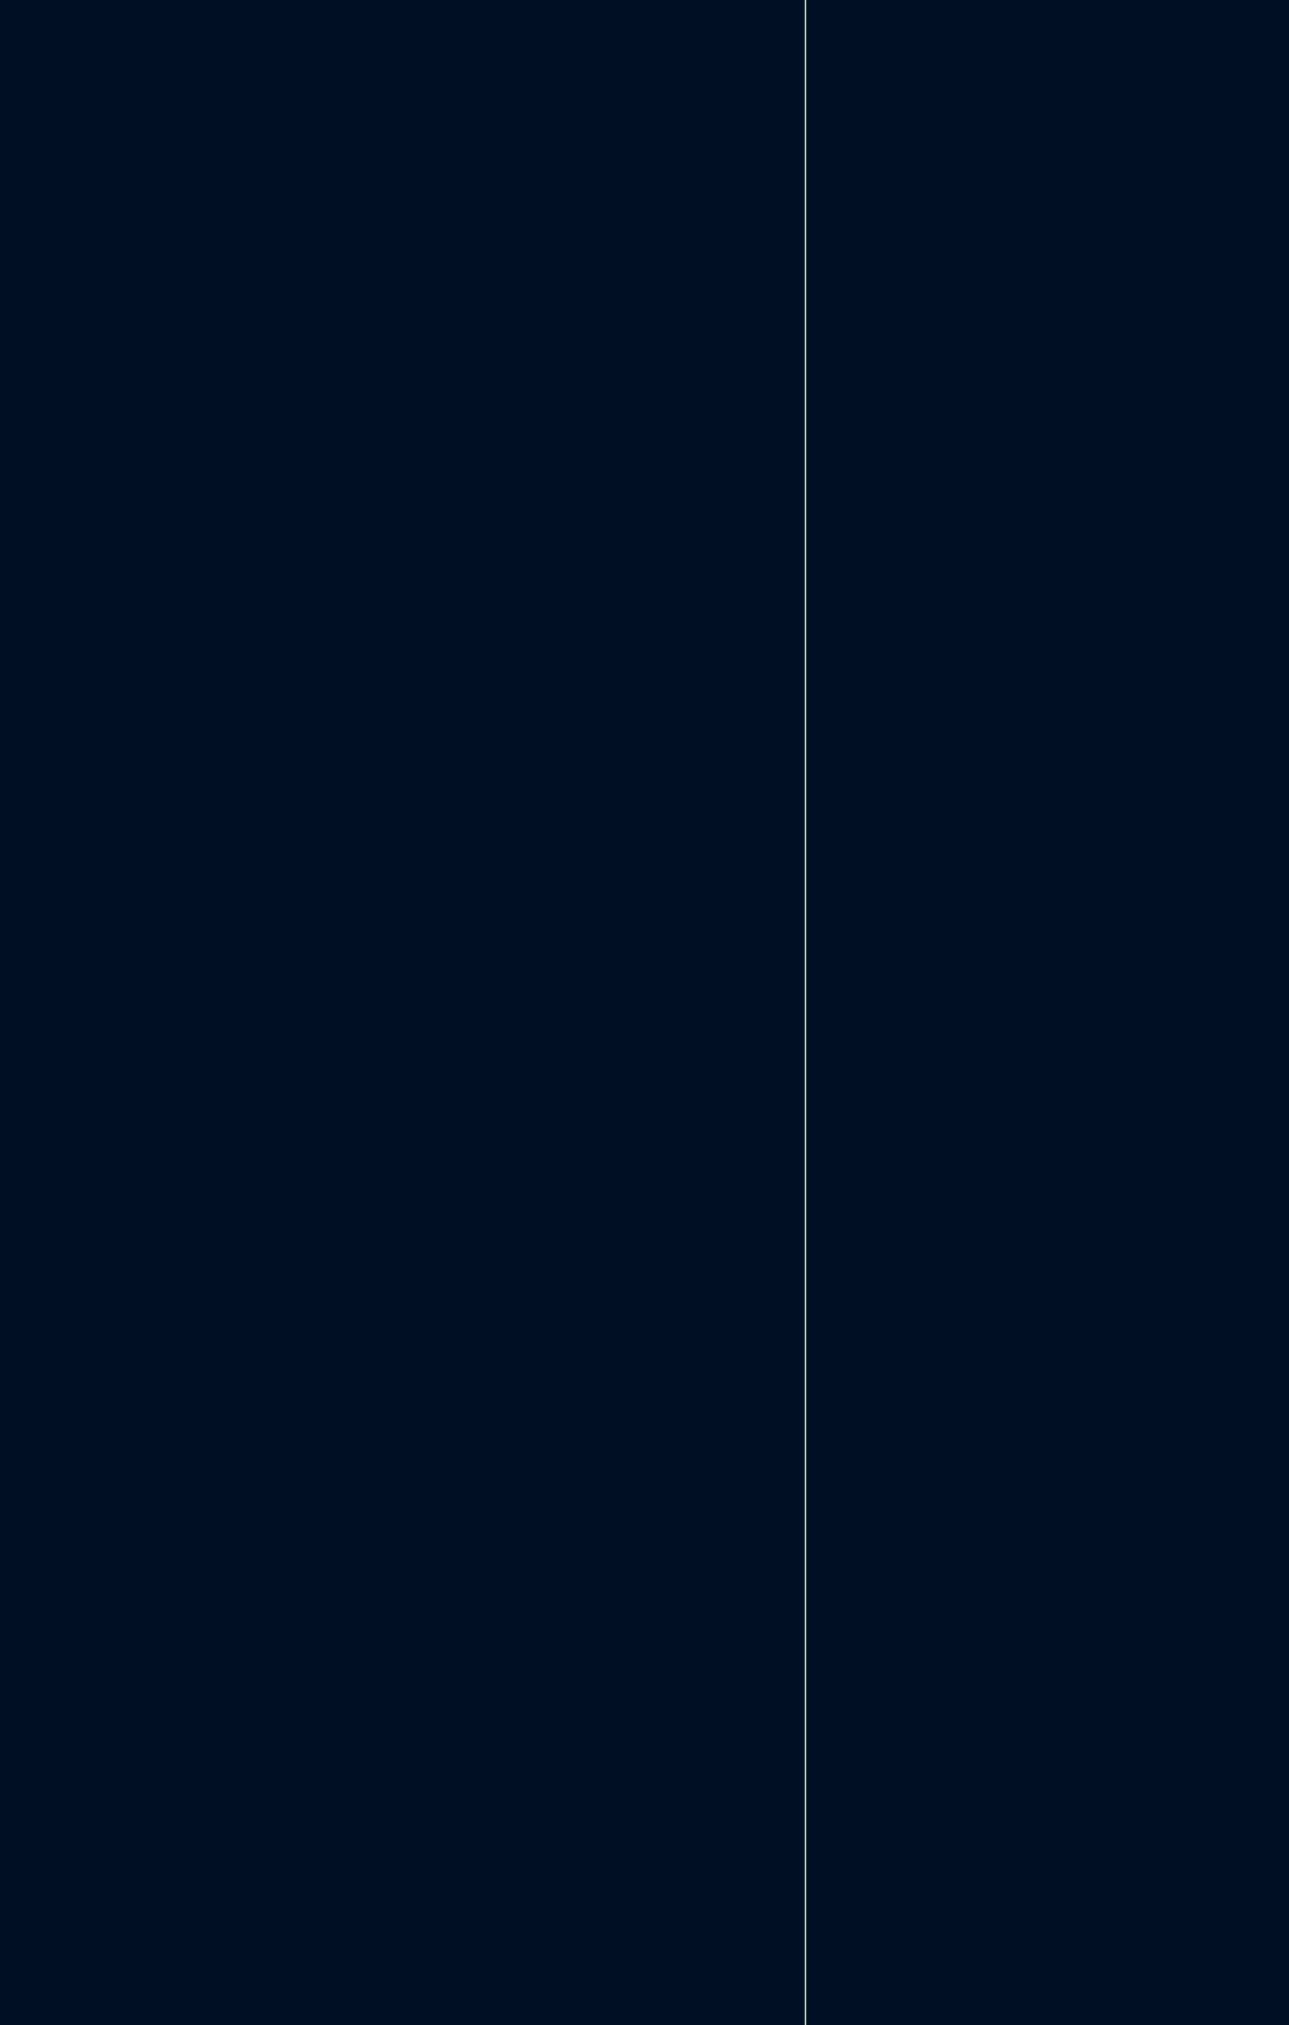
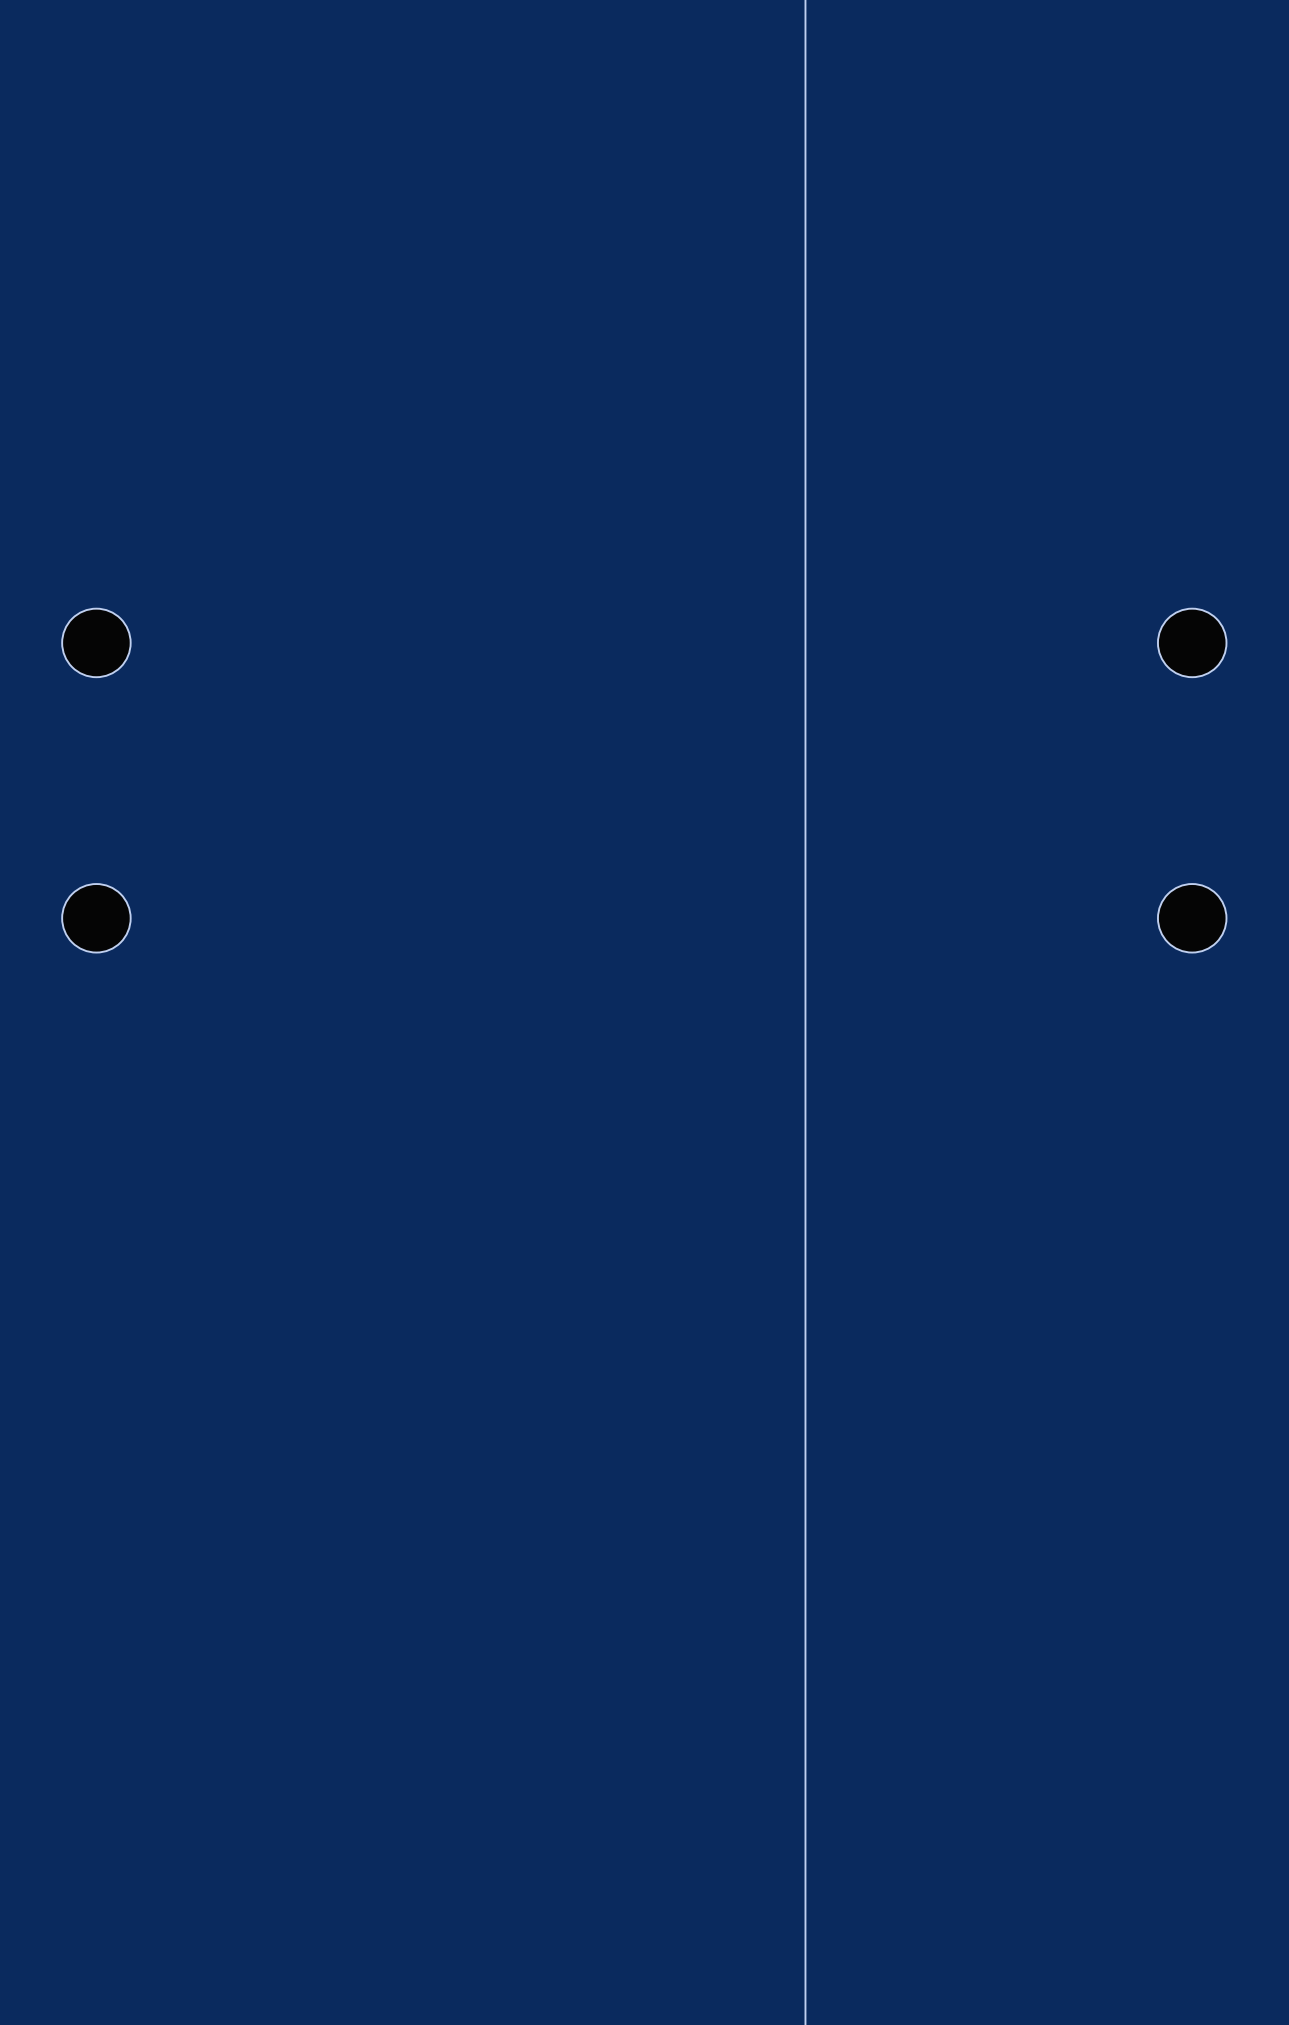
part: none -> (96, 642)
part: none -> (1192, 642)
part: none -> (96, 918)
part: none -> (1192, 918)

